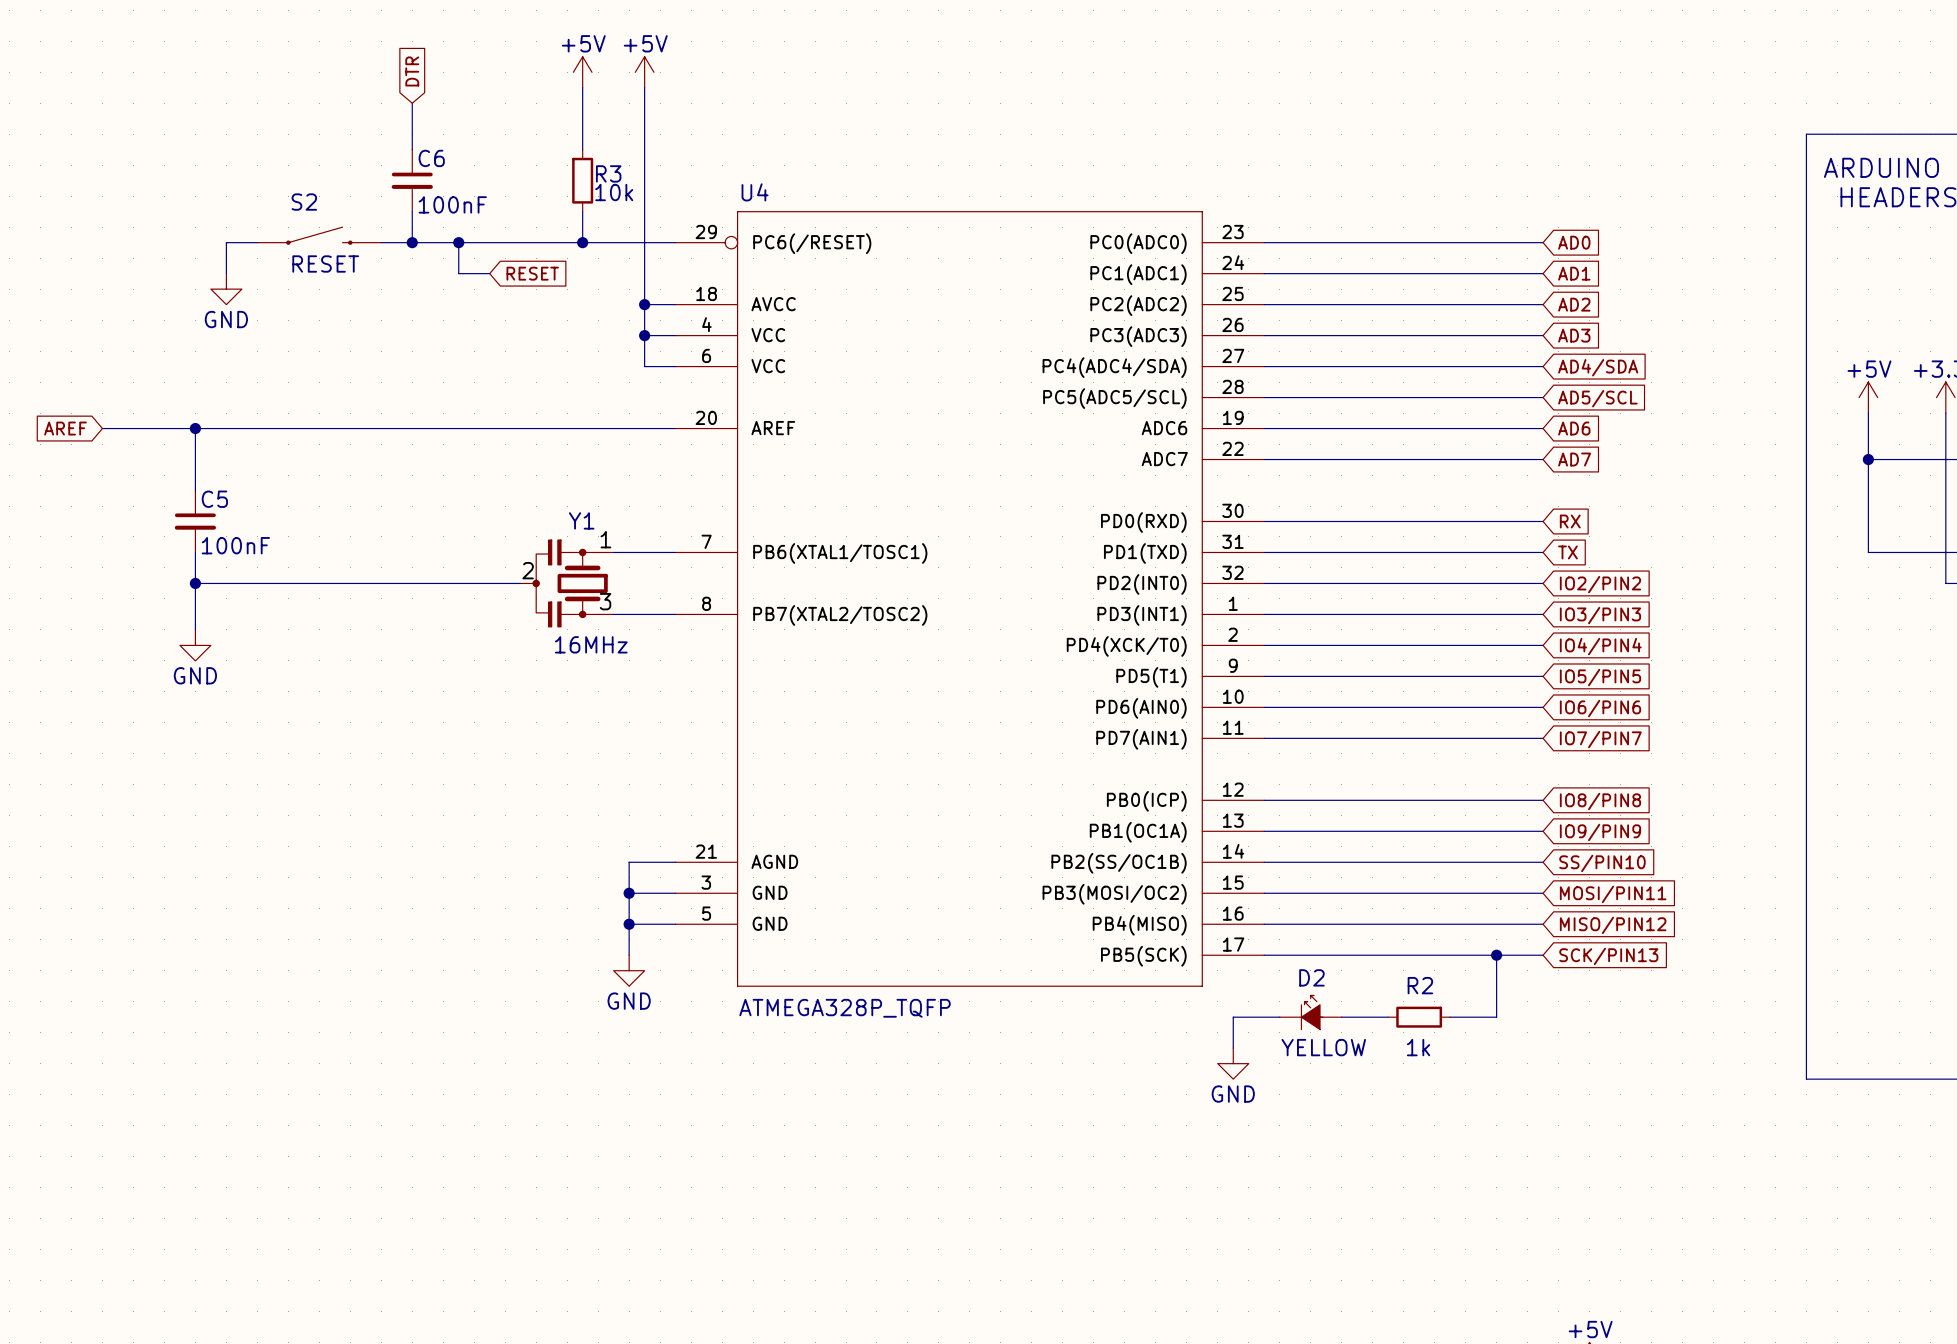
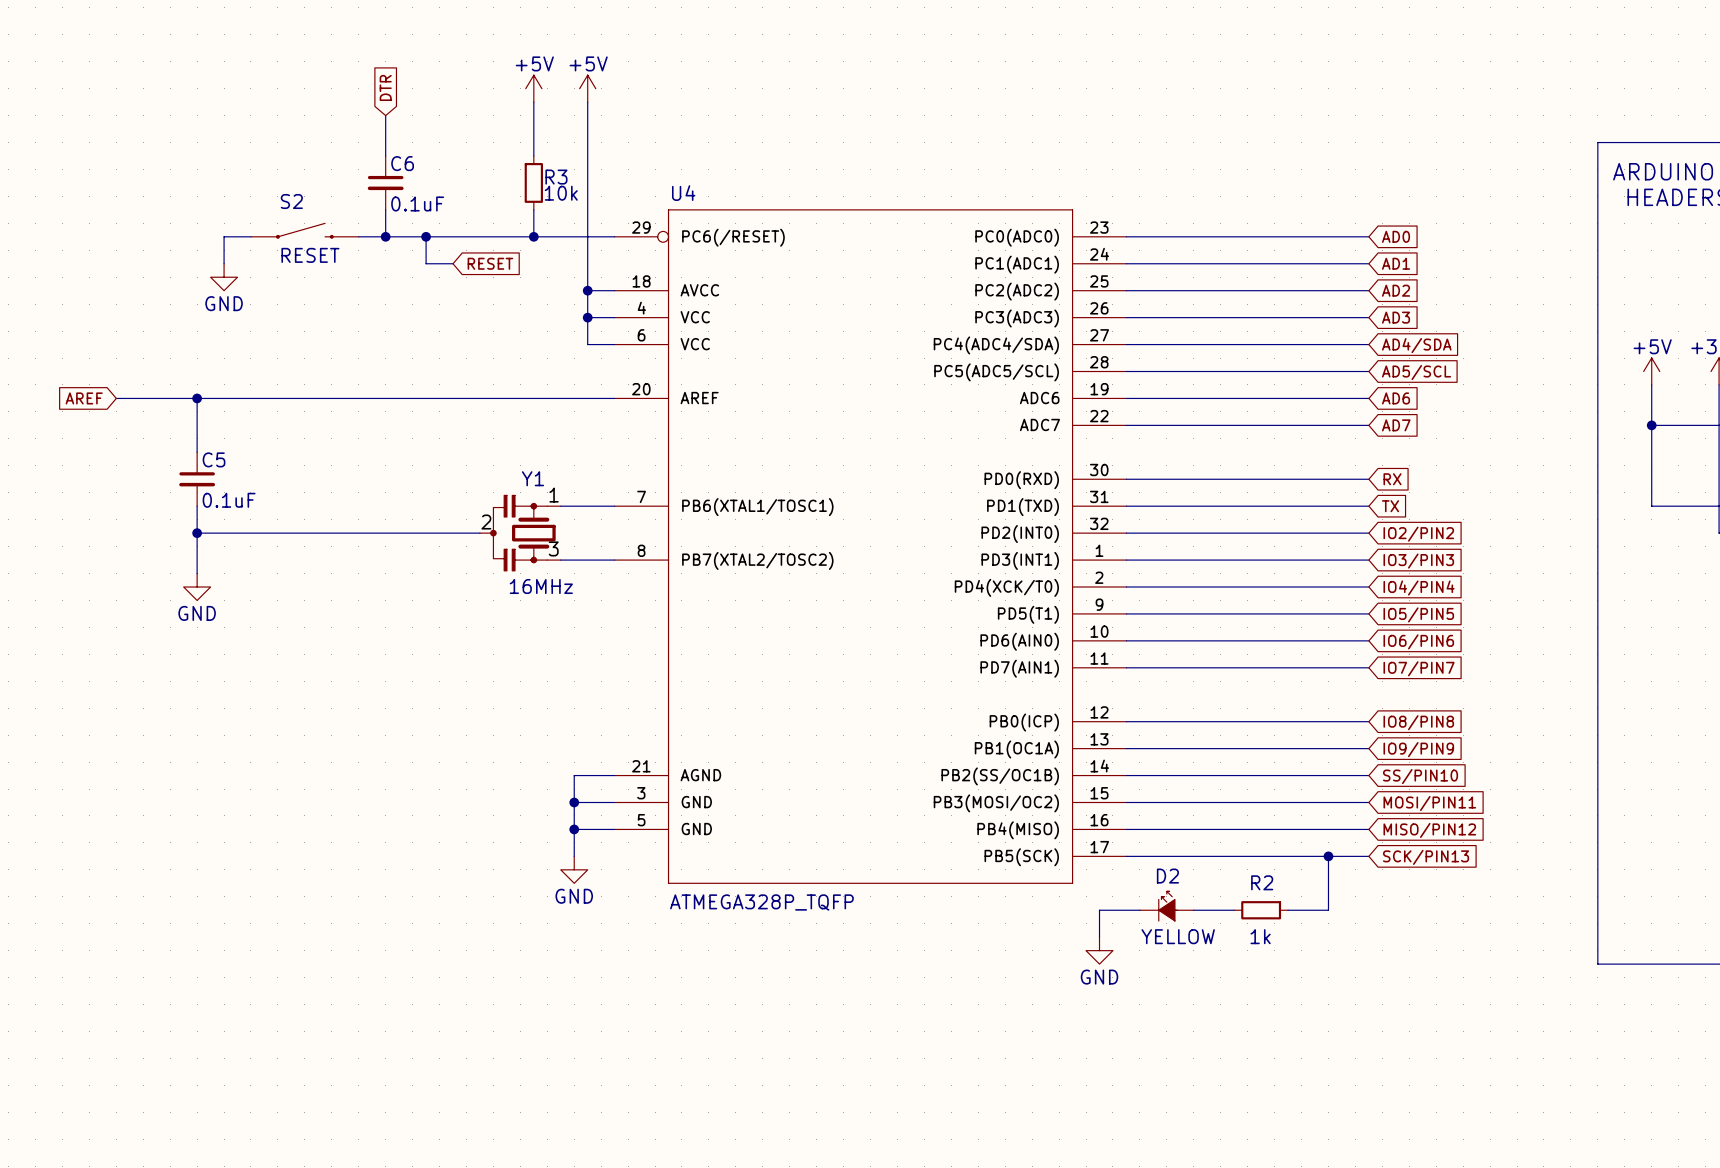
C6 value: 100nF (452, 204) -> 0.1uF (417, 203)
C5 value: 100nF (235, 545) -> 0.1uF (229, 500)

